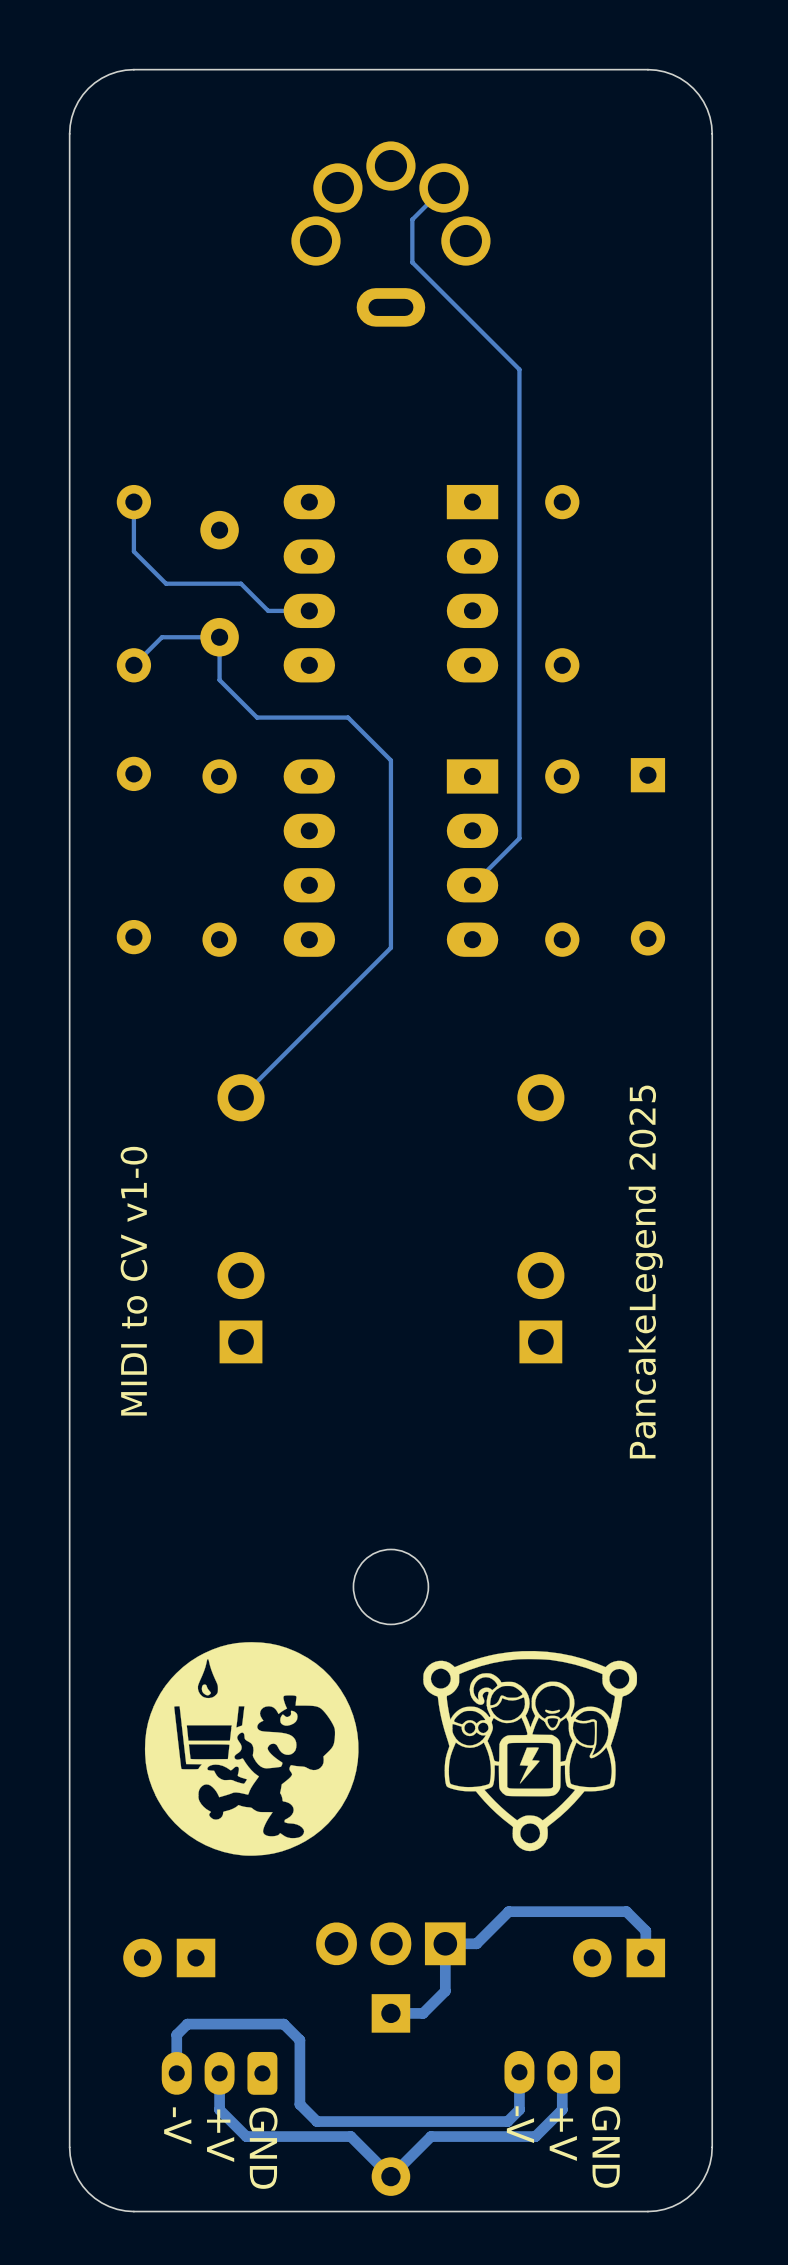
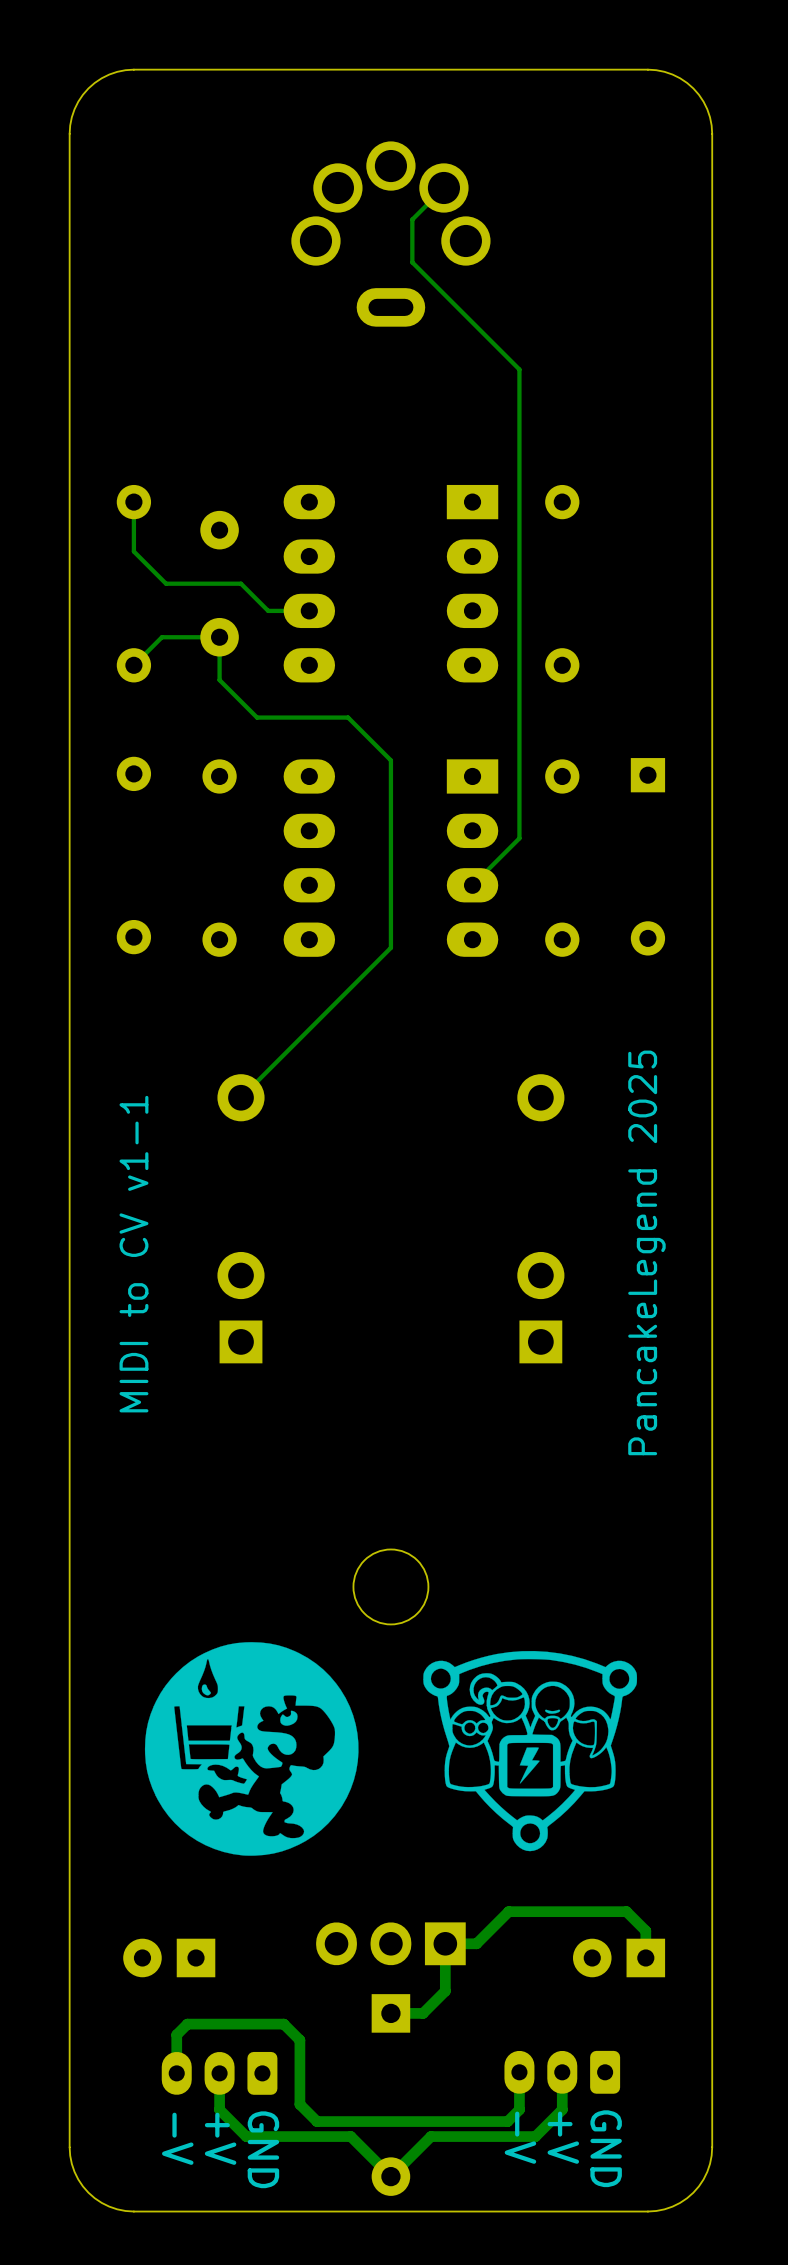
text: MIDI to CV v1-0 (133, 1281) -> MIDI to CV v1-1 (133, 1254)

